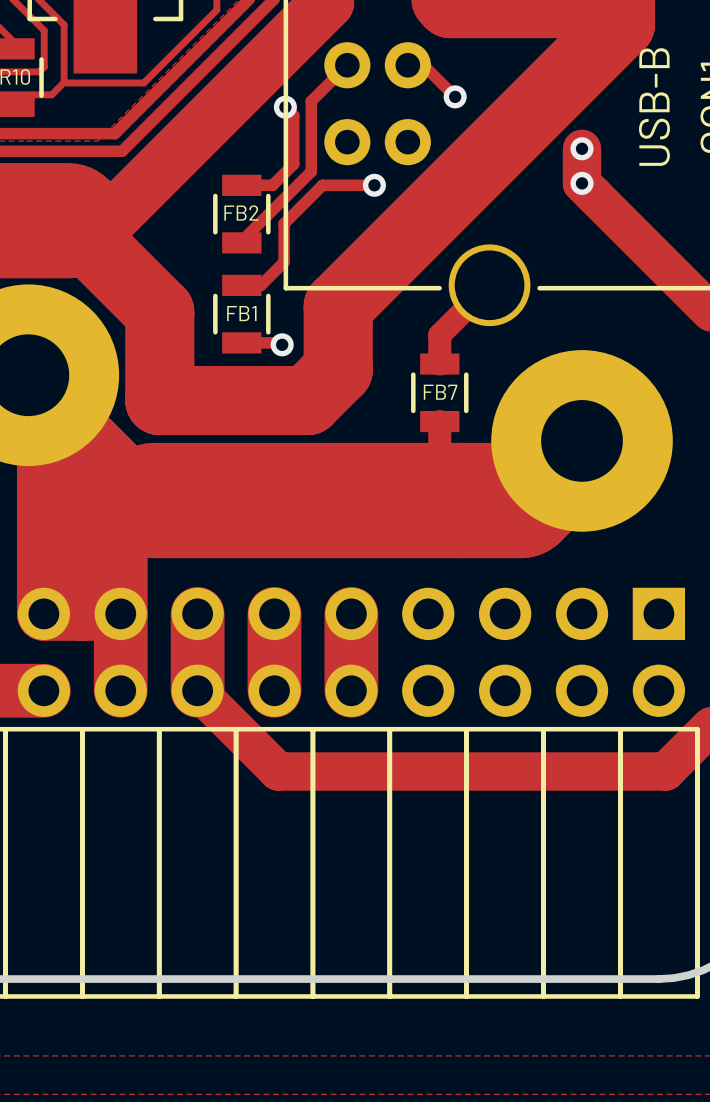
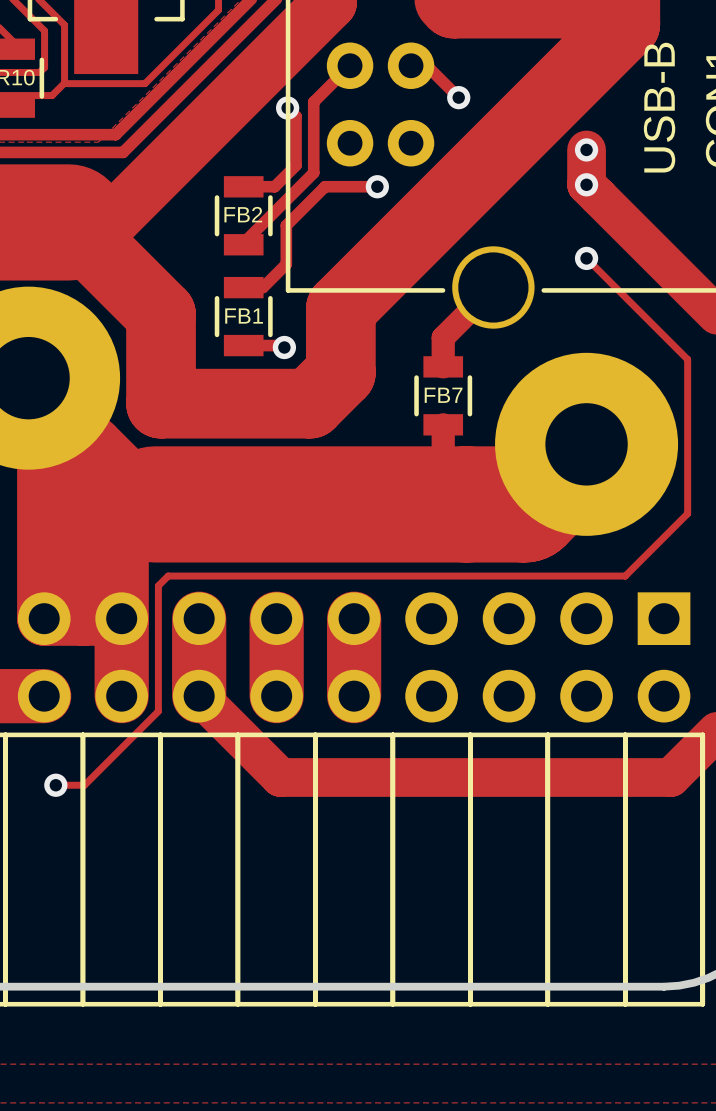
track: none -> (586, 258) (687, 359) (687, 513) (625, 576) (168, 576) (158, 585) (158, 711) (84, 785) (55, 785)
via: none -> (586, 258)
via: none -> (55, 785)

